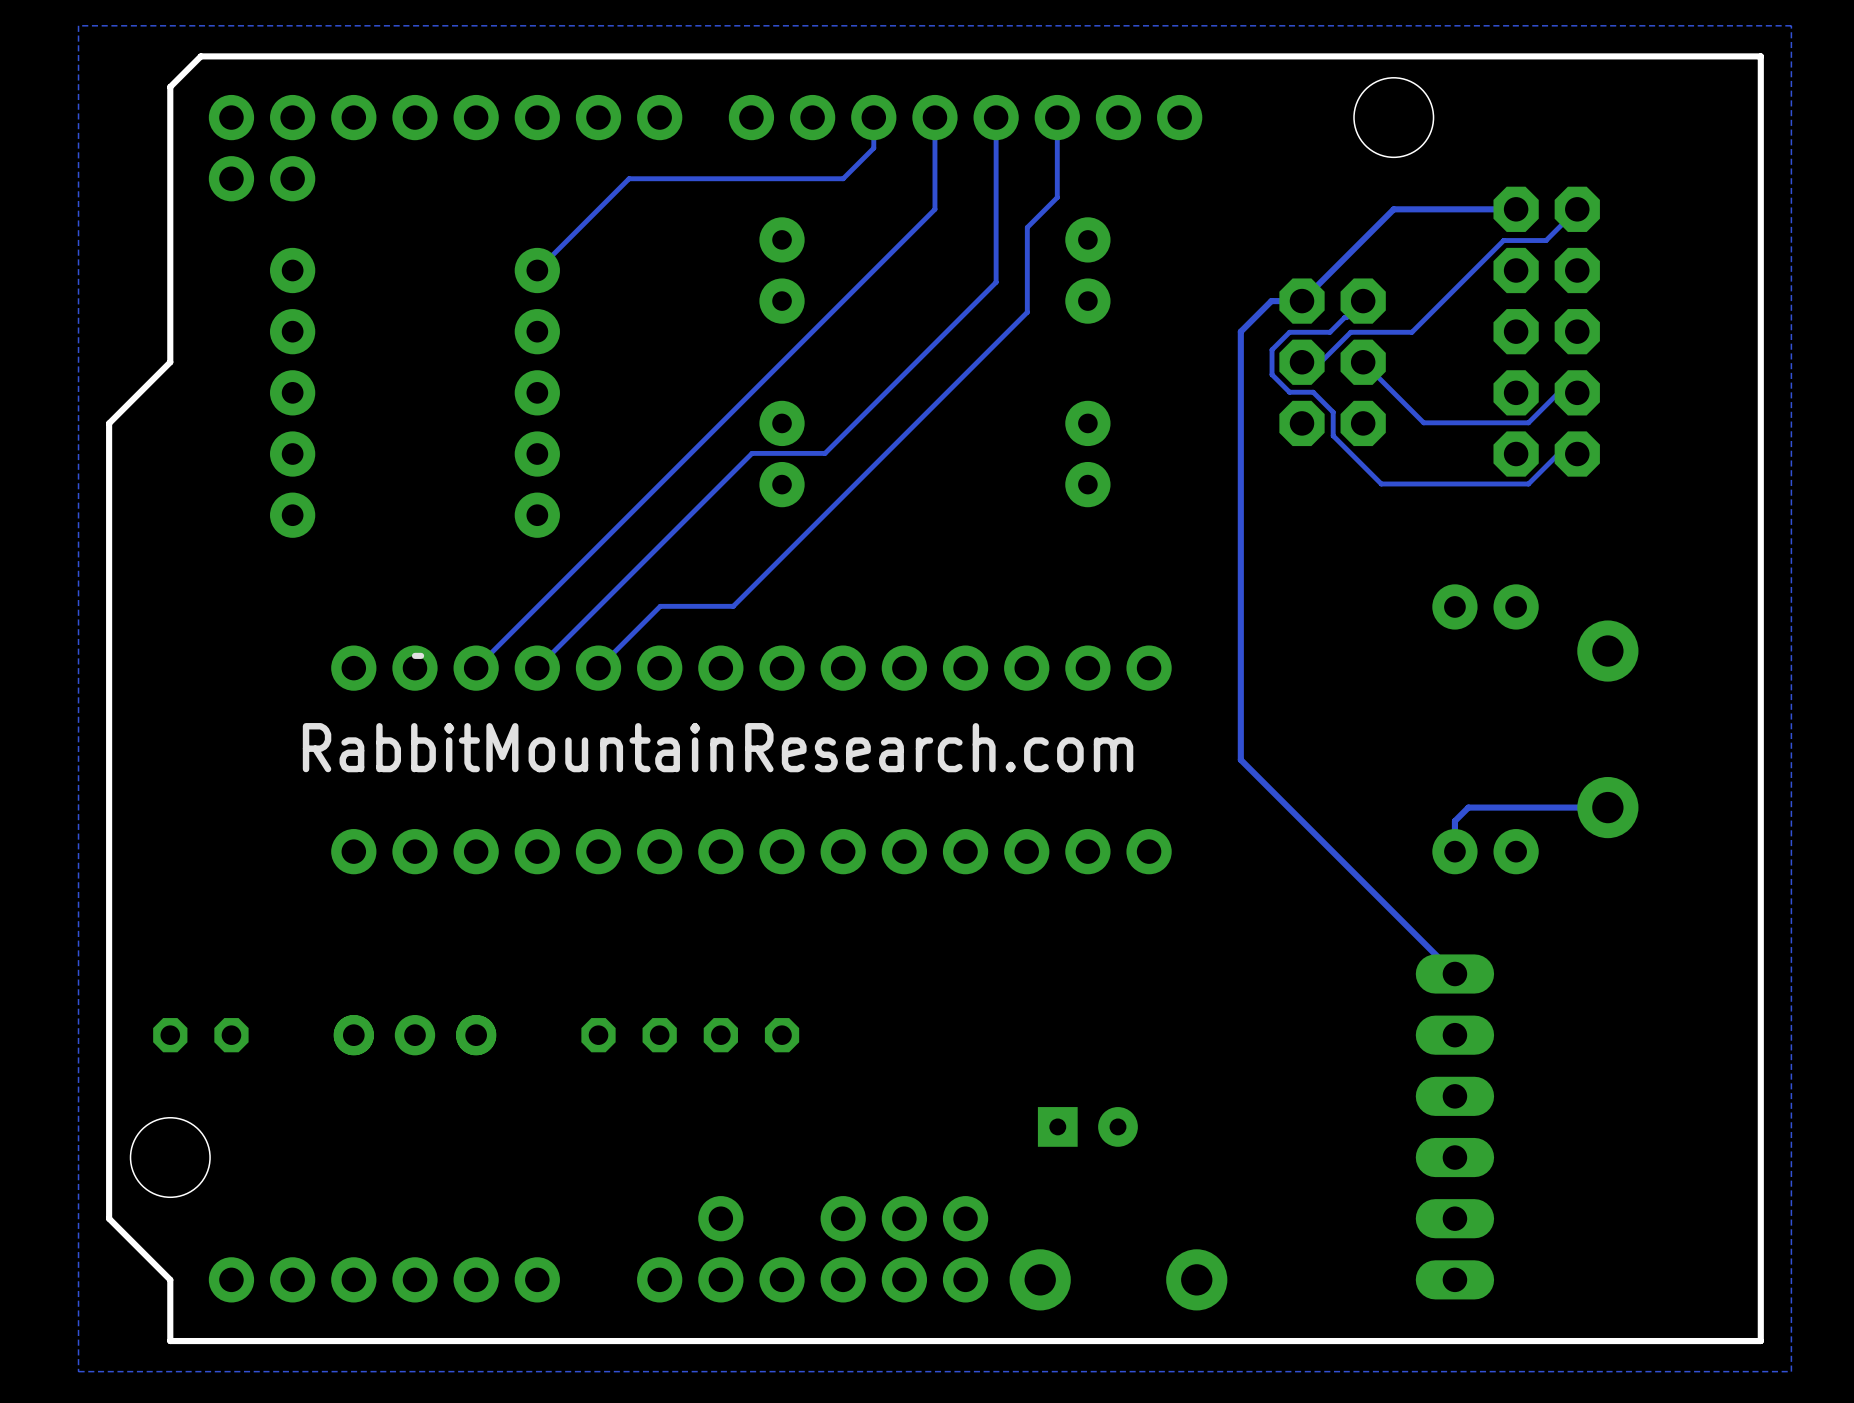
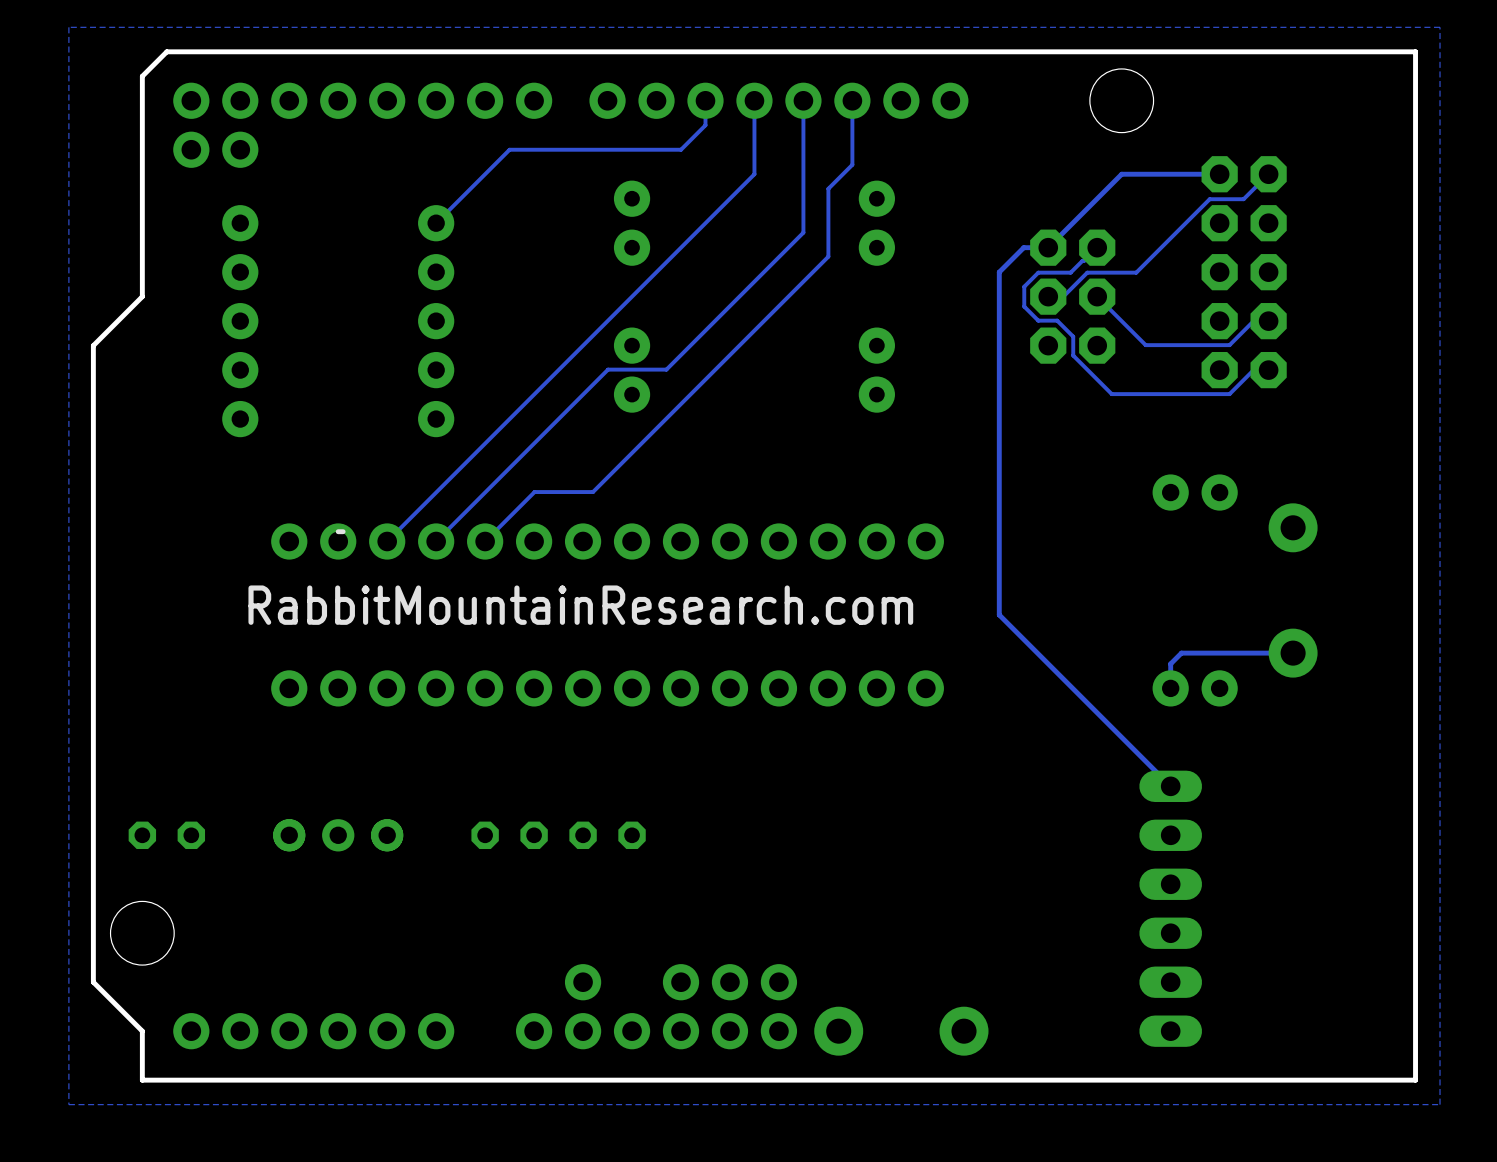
part: (1087, 1126) -> none

